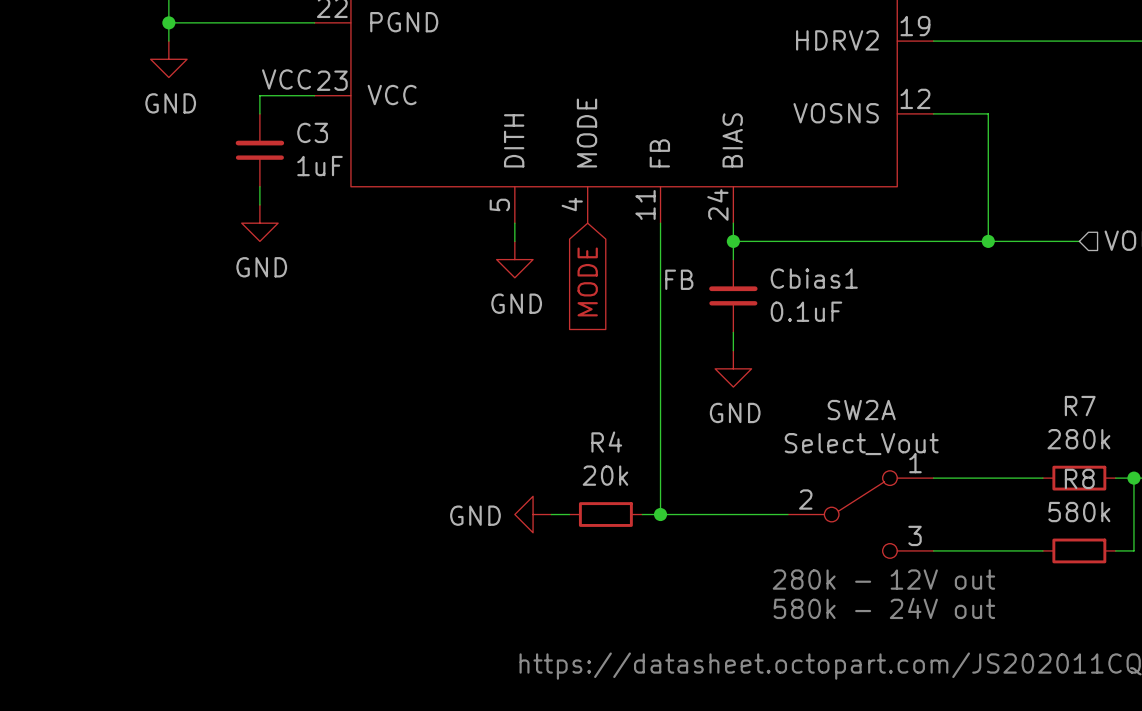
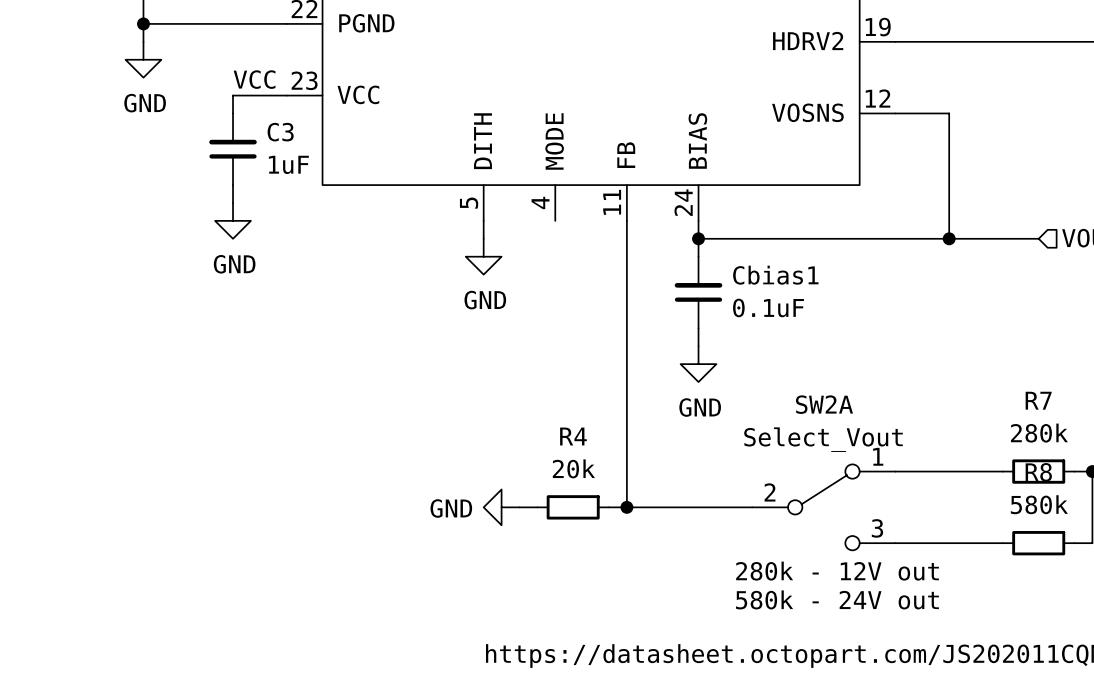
label: FB (679, 279) -> none
global label: MODE (587, 281) -> none

